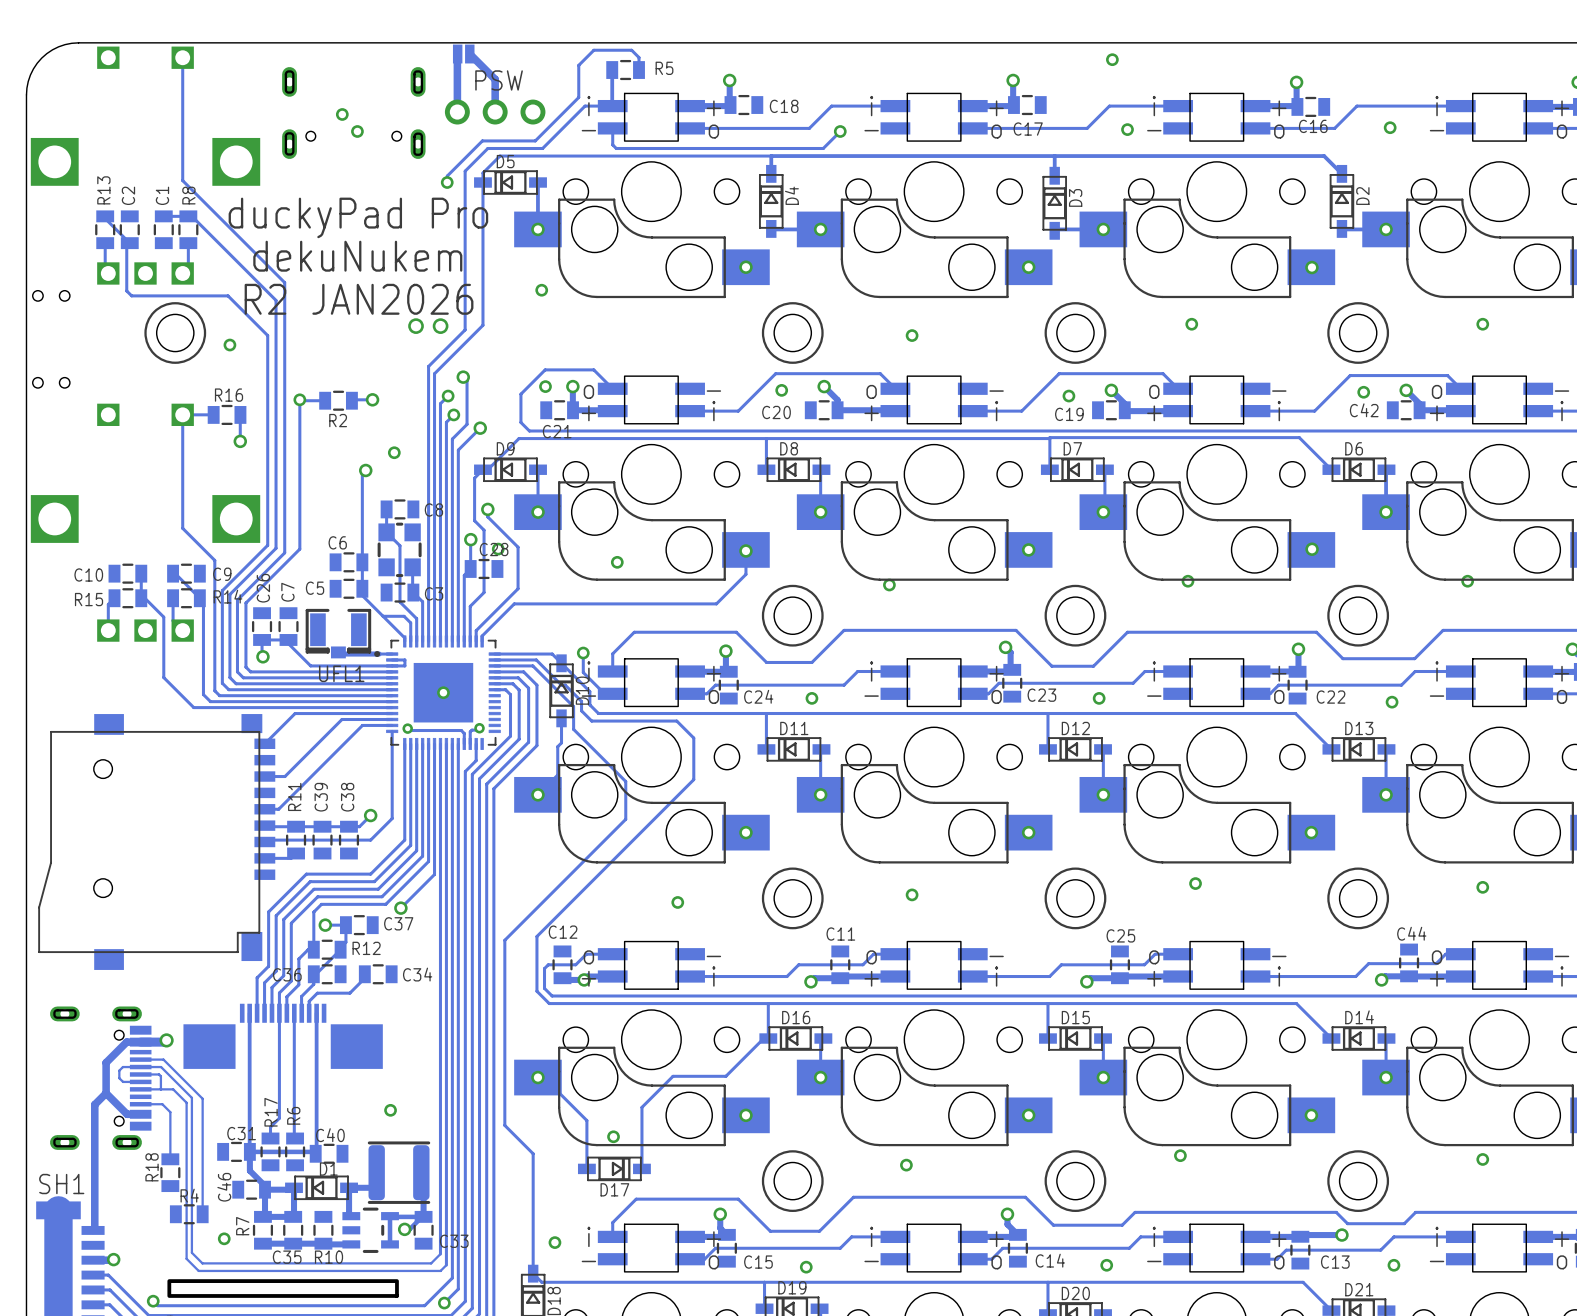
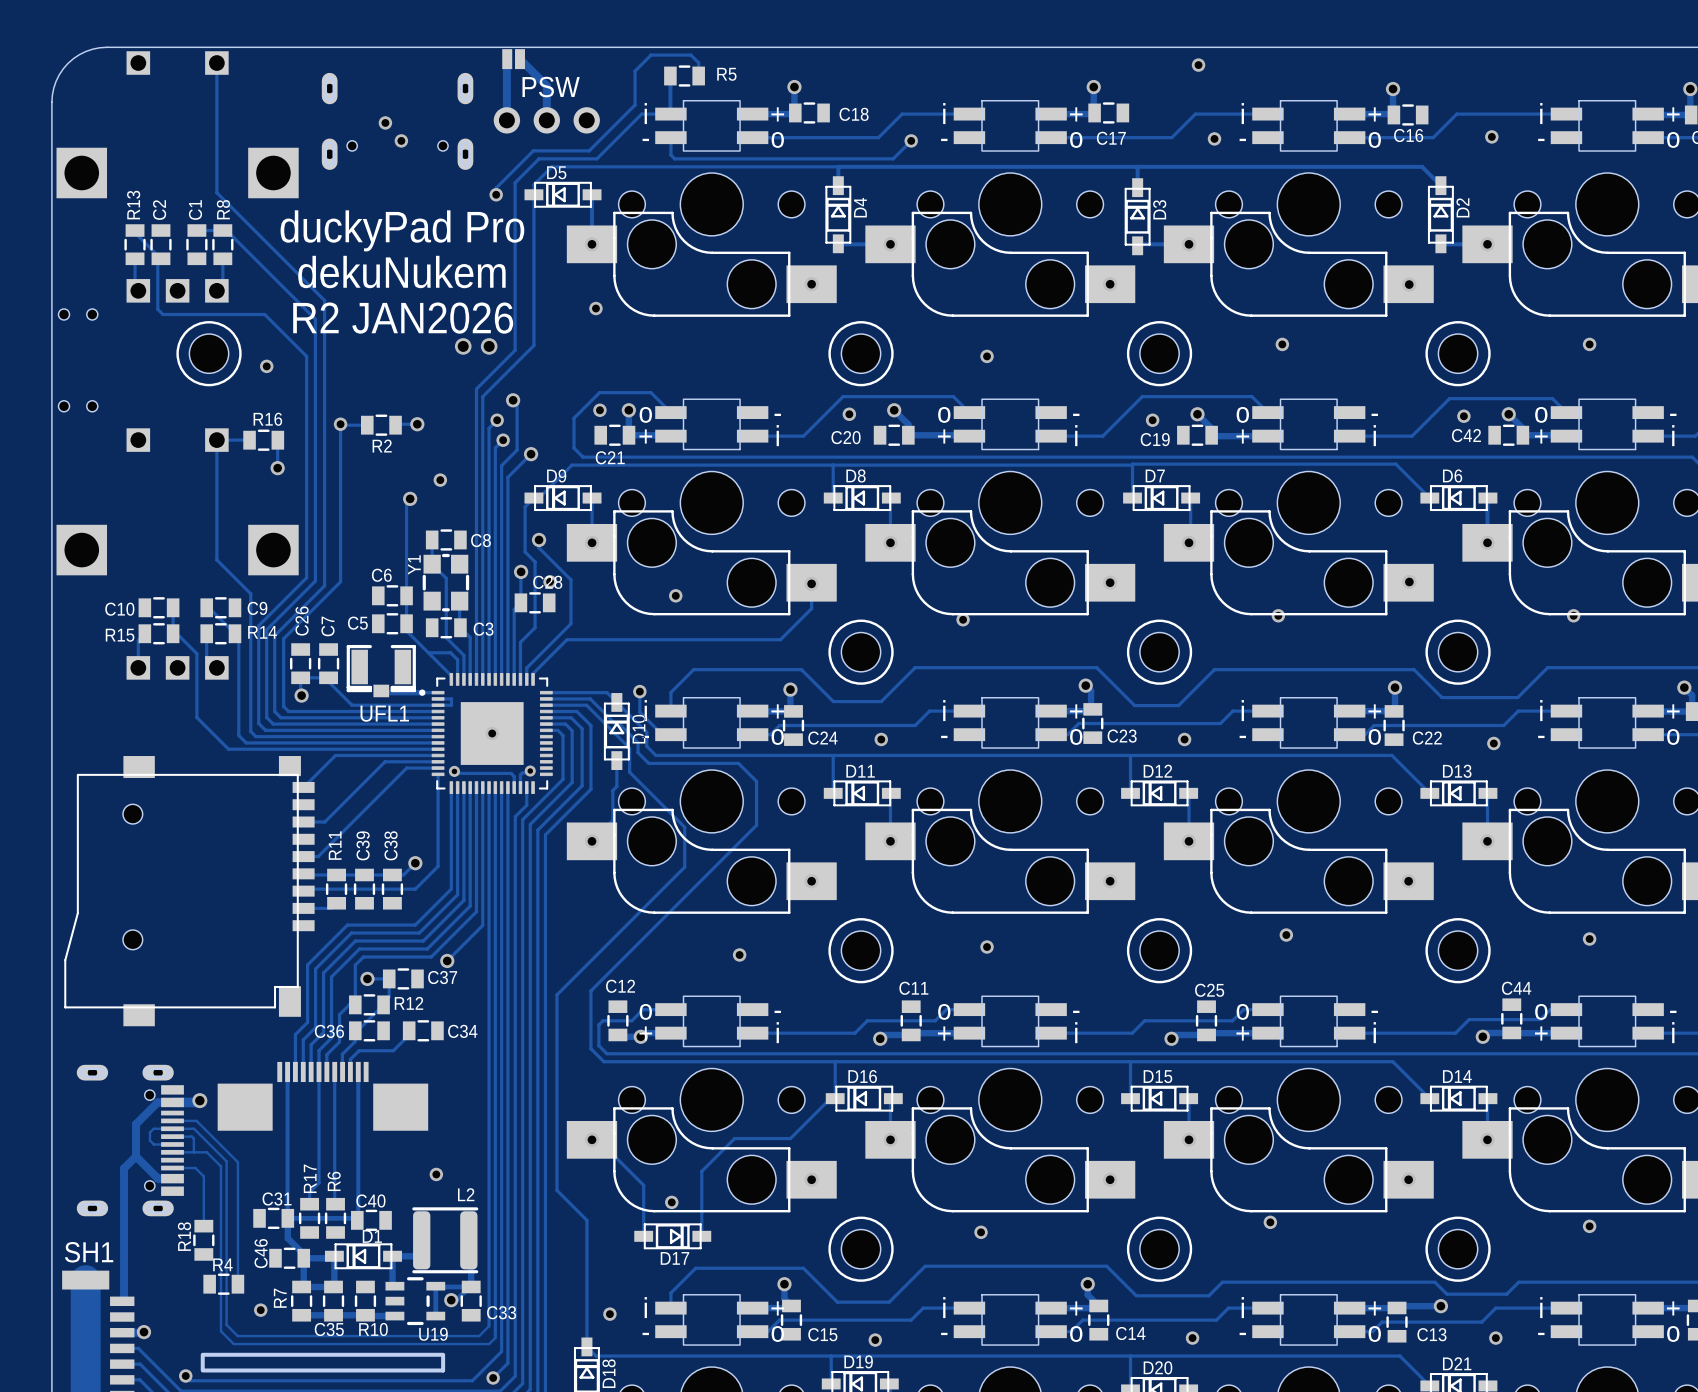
Y1 name: none -> Y1 (414, 564)
L2 name: none -> L2 (466, 1194)
U19 name: none -> U19 (433, 1334)

